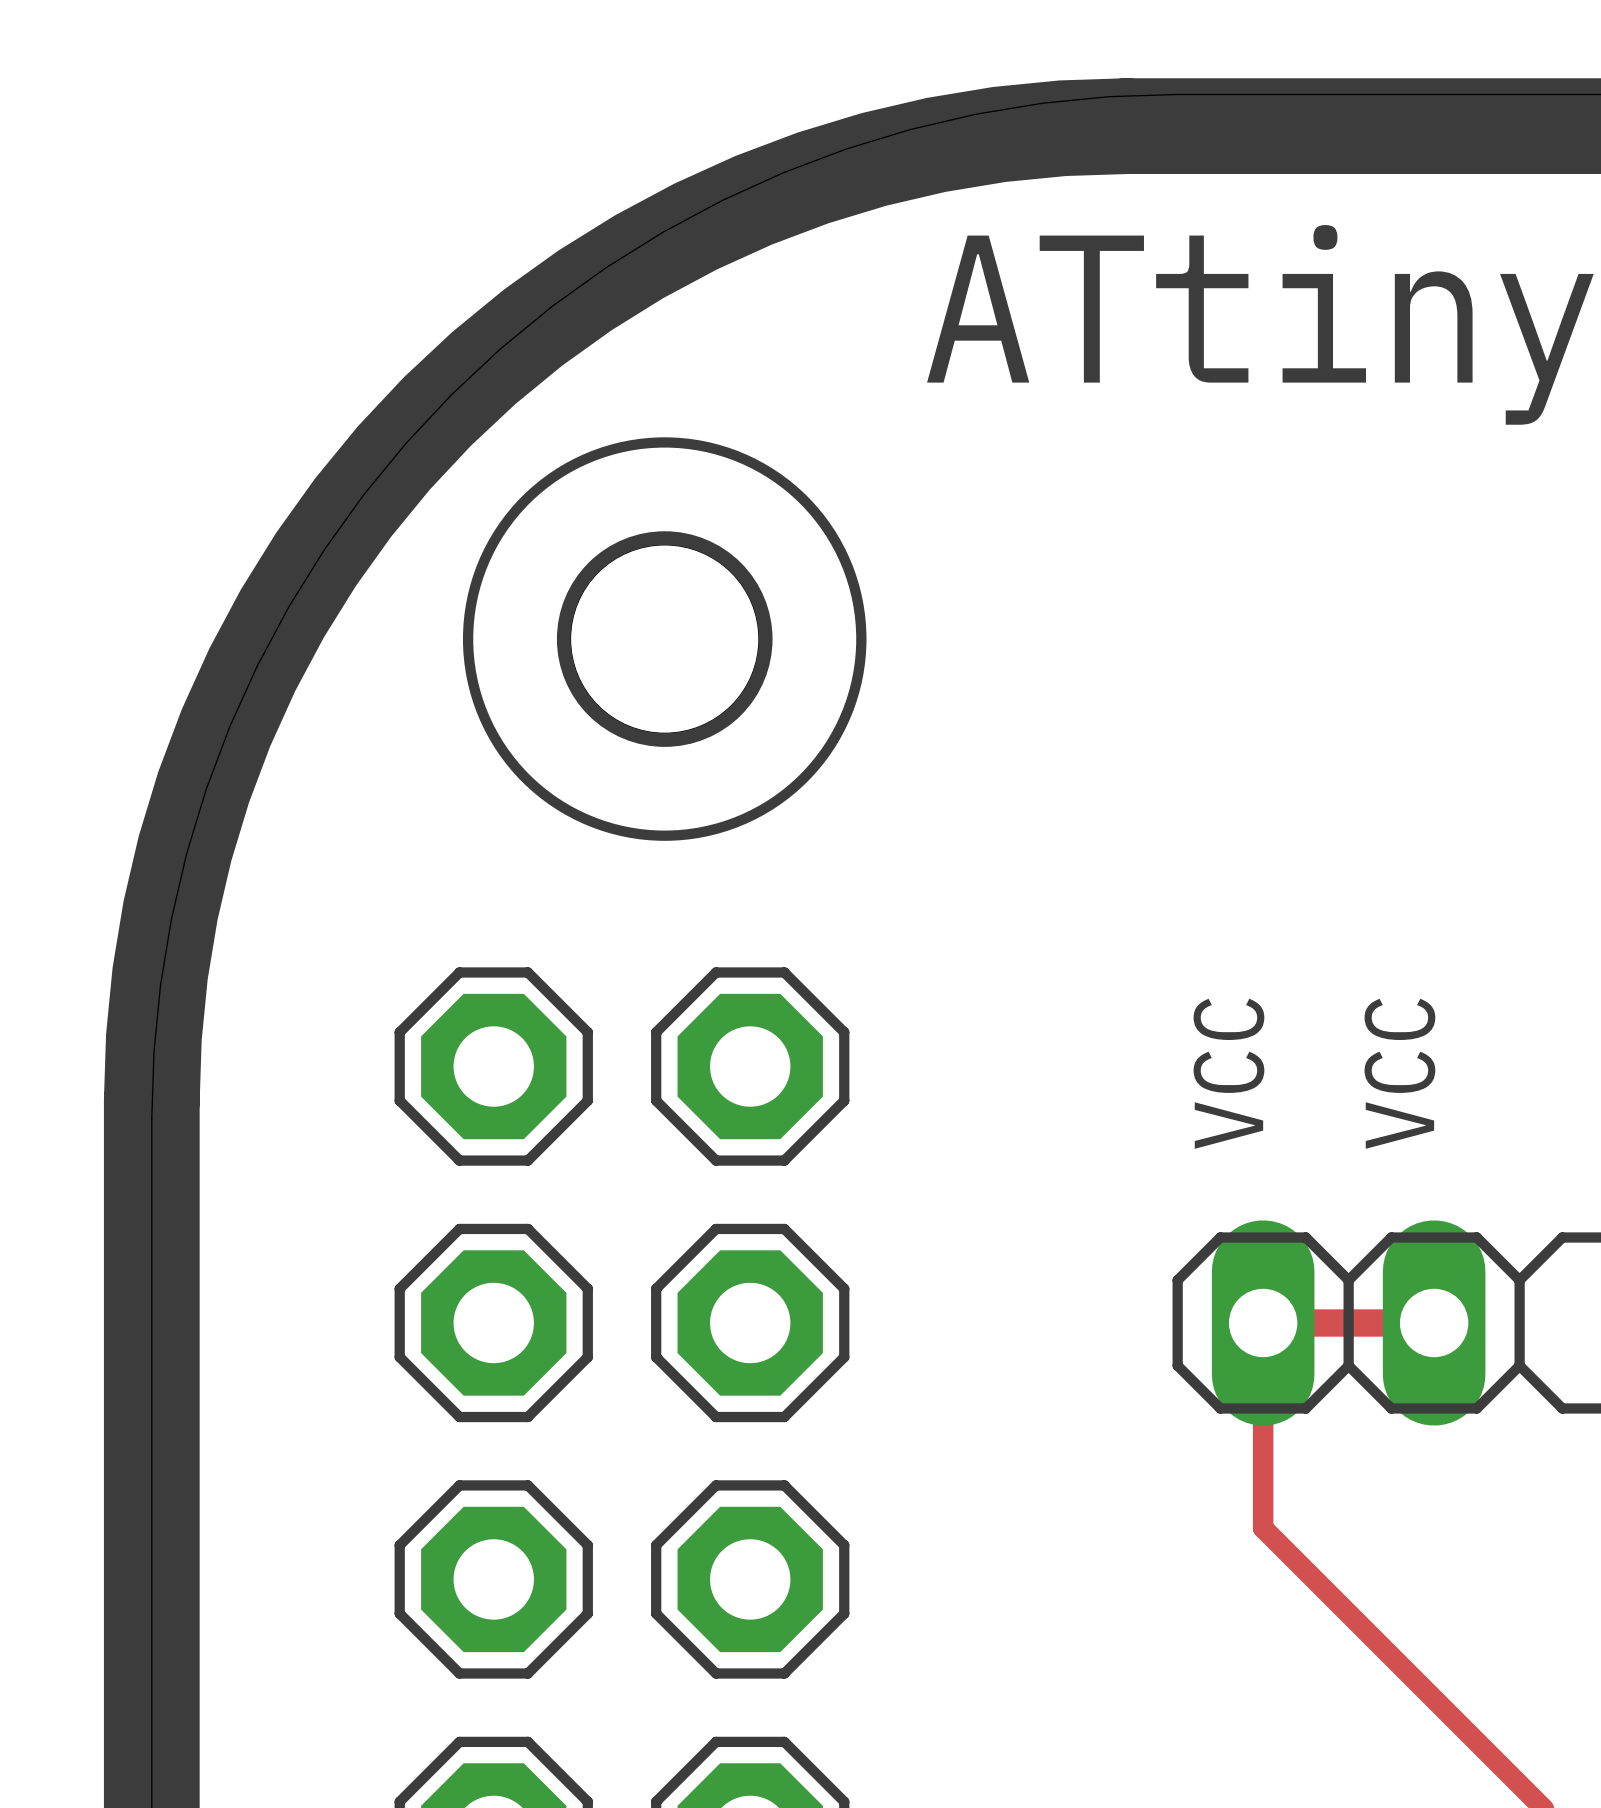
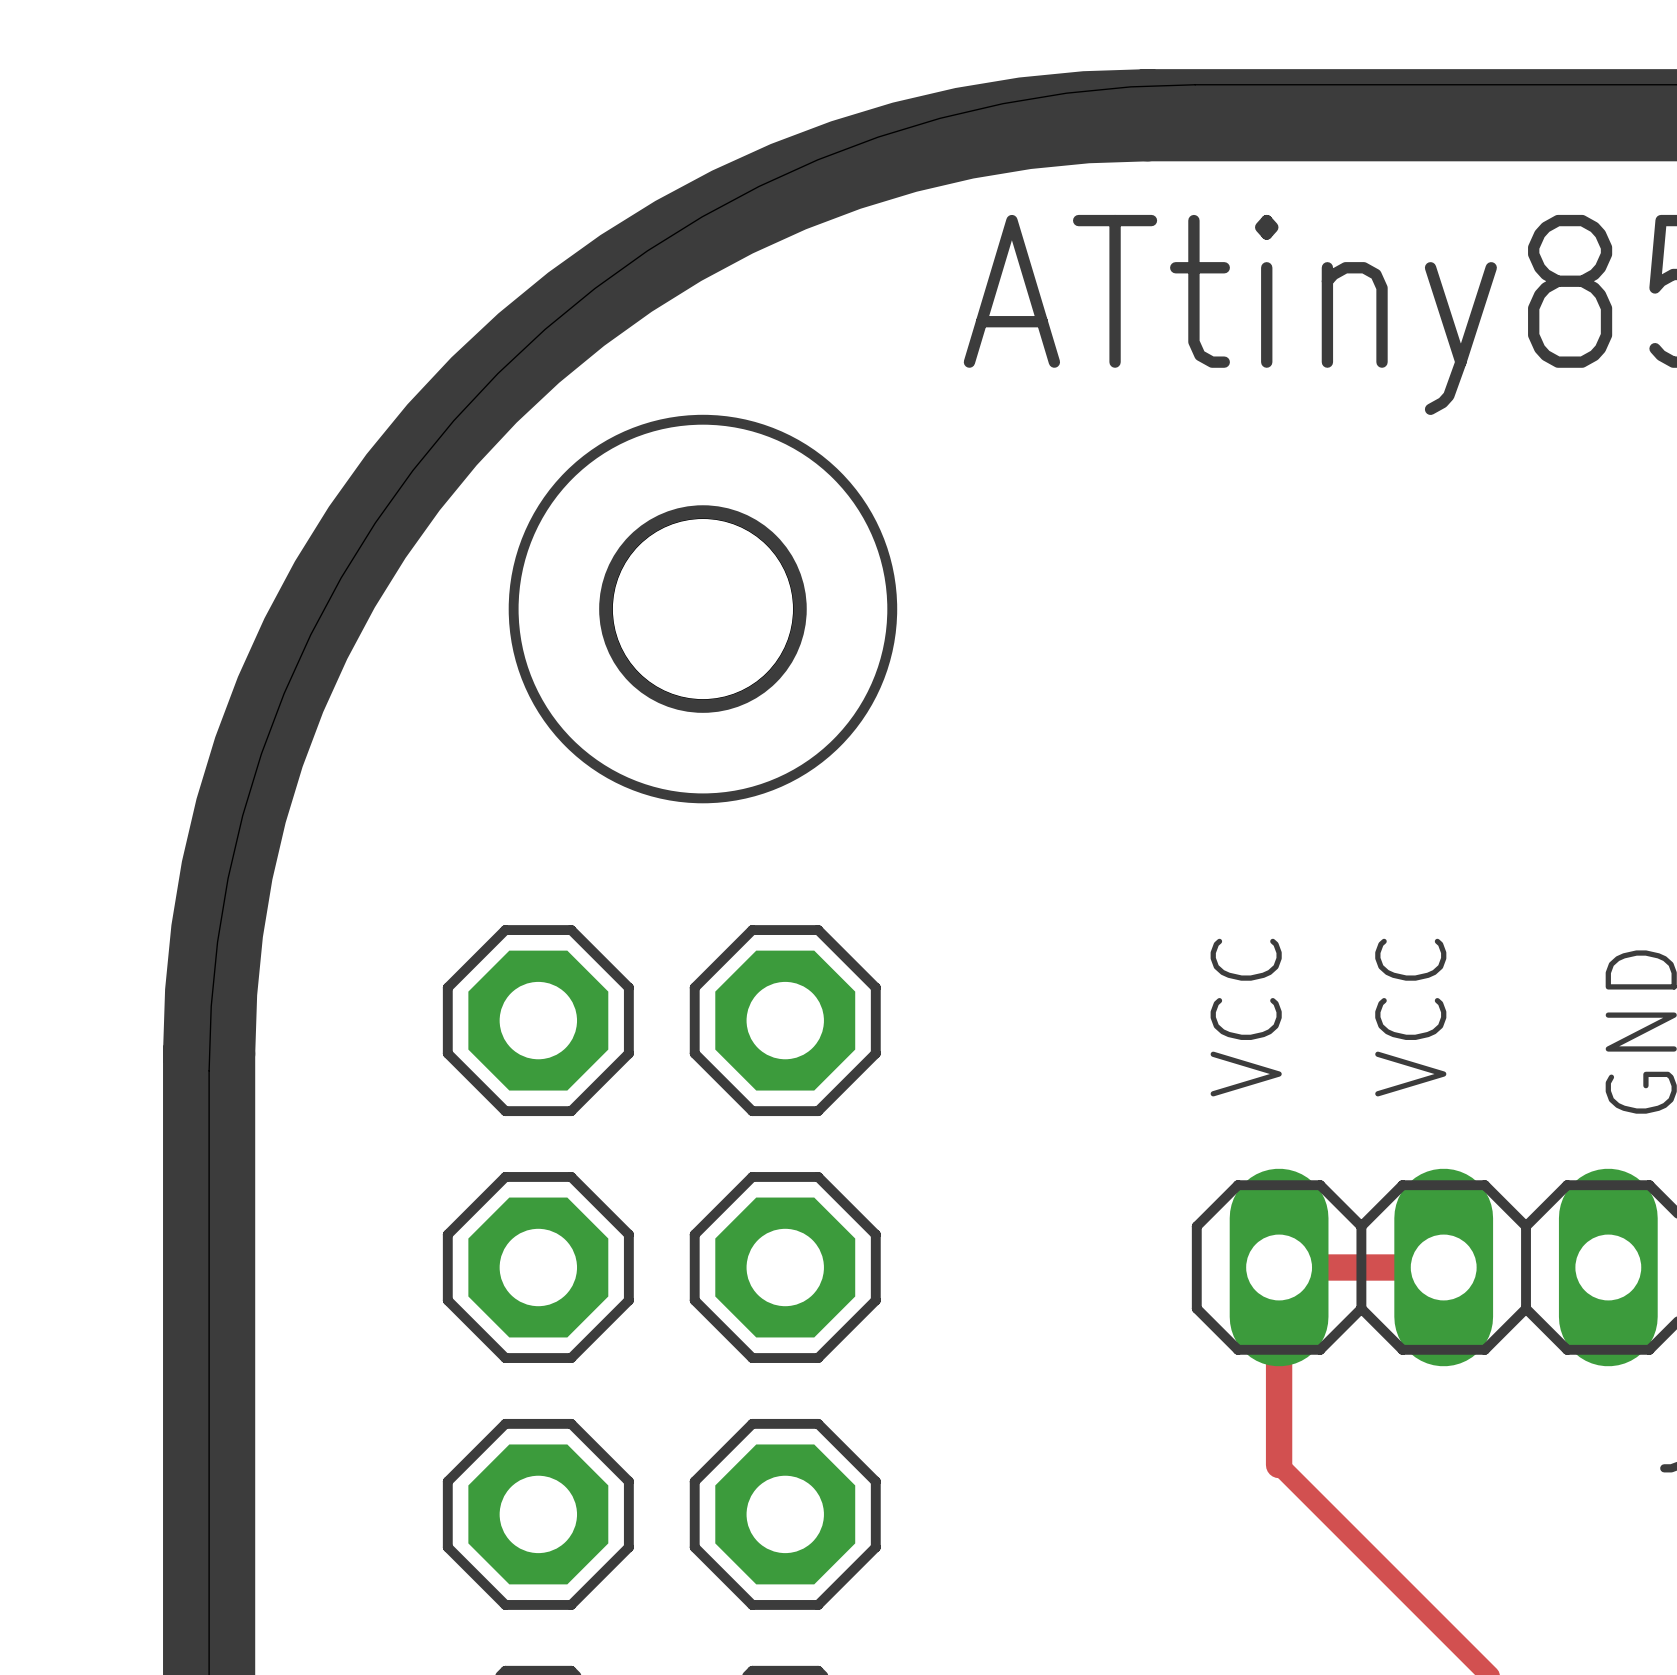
top track width: thin (1263, 1322) (1263, 1528) -> thick (1279, 1267) (1279, 1465)

